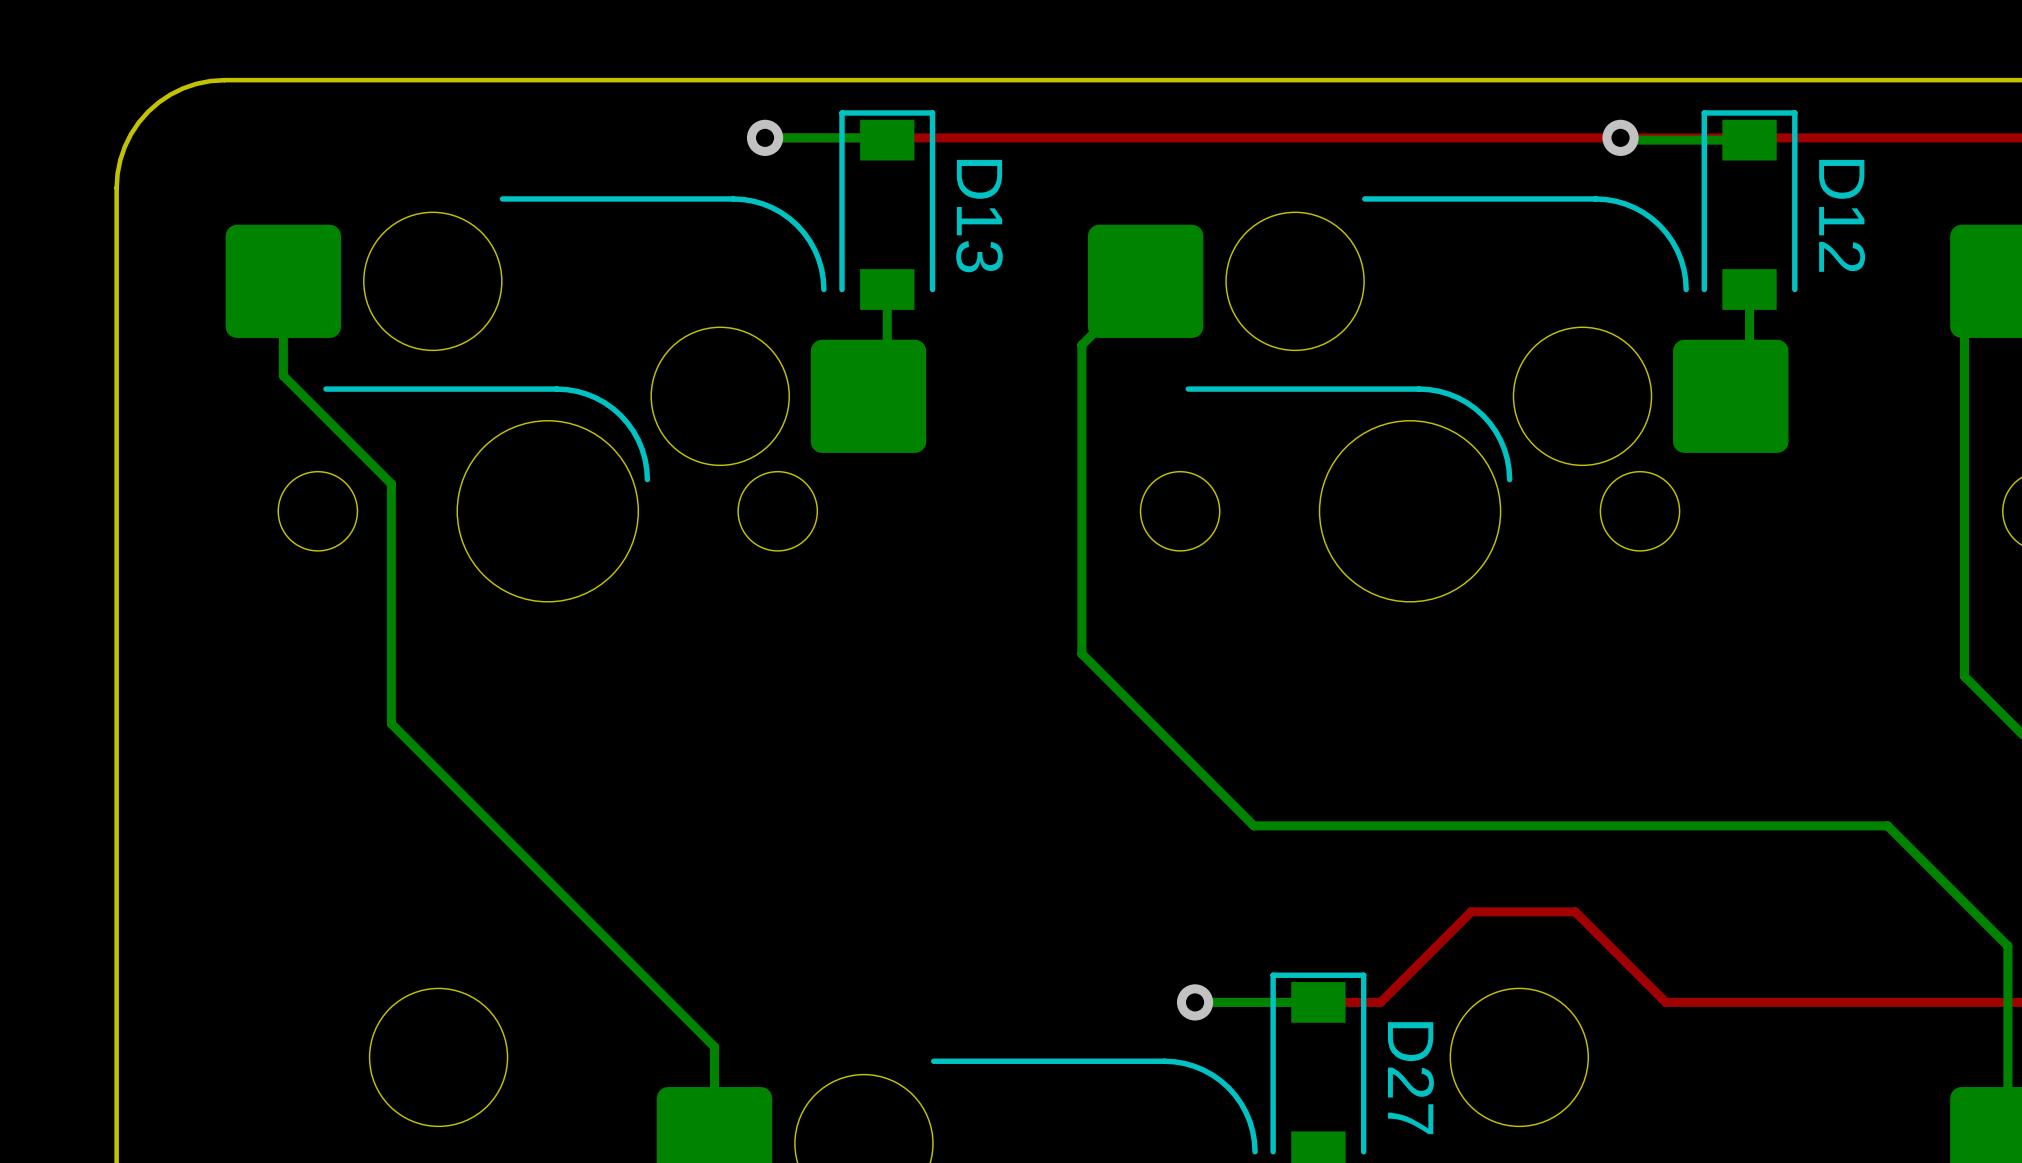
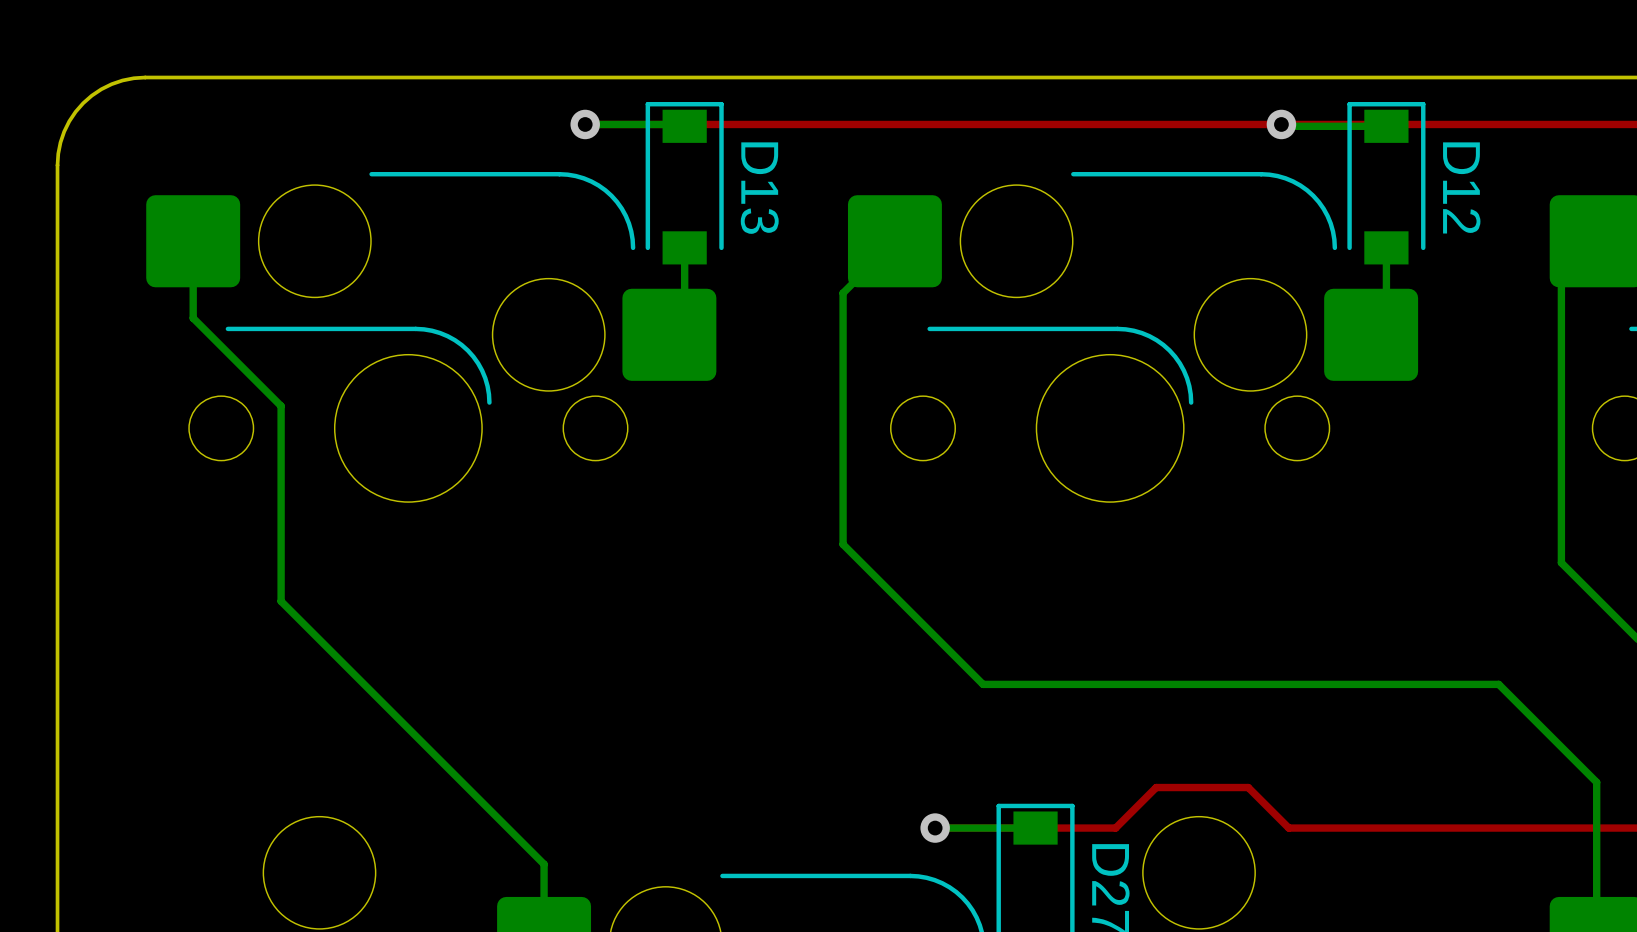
top track: (1665, 1002) (1575, 911) (1471, 911) (1380, 1002) -> (1318, 828) (1288, 828) (1248, 787) (1156, 787) (1115, 828) (1086, 828)

